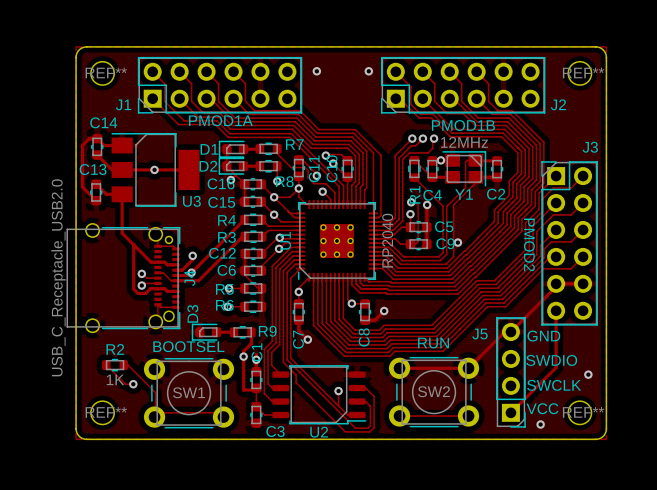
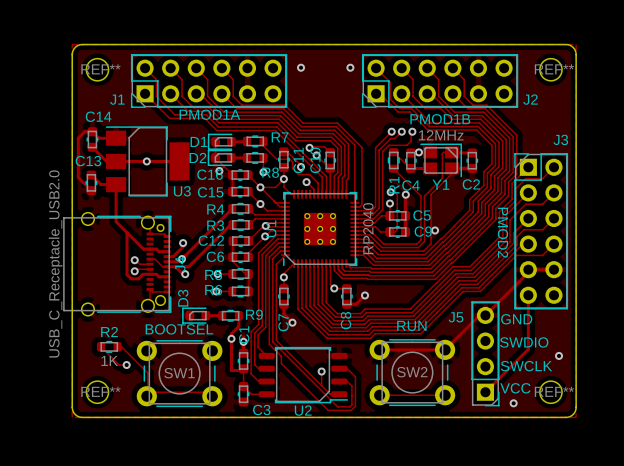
track: none -> (175, 266) (185, 274)
via: none -> (185, 274)

